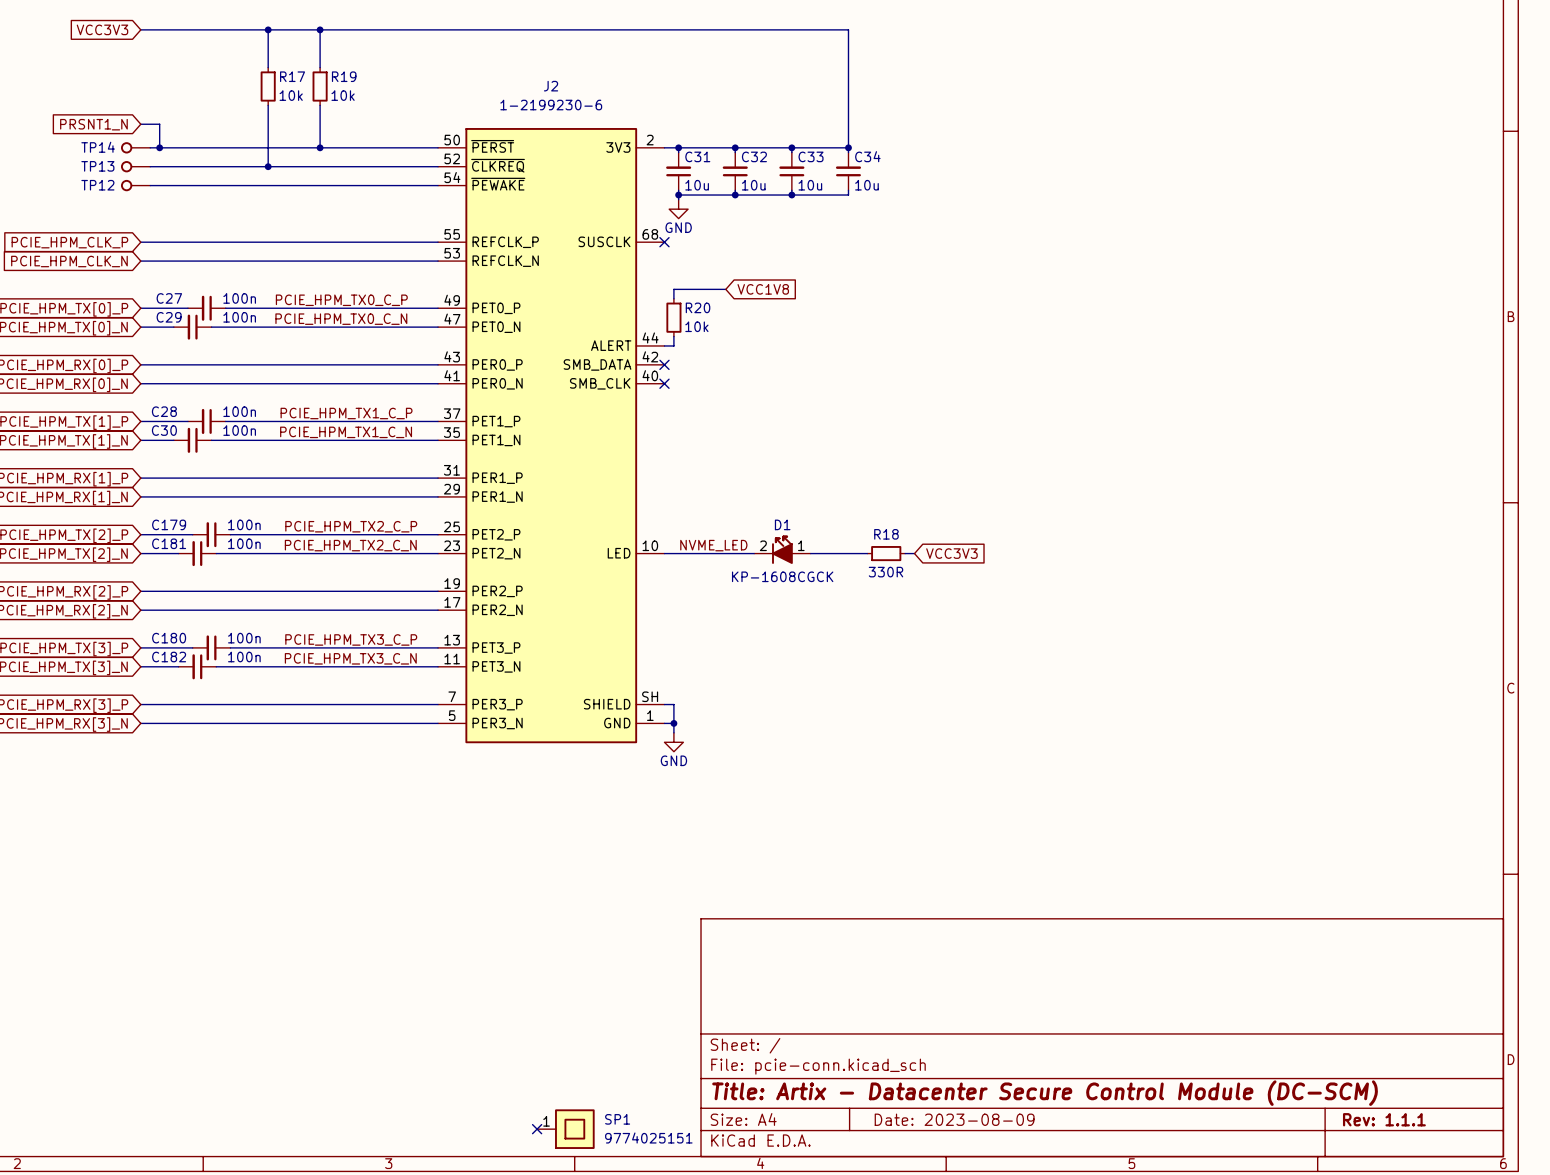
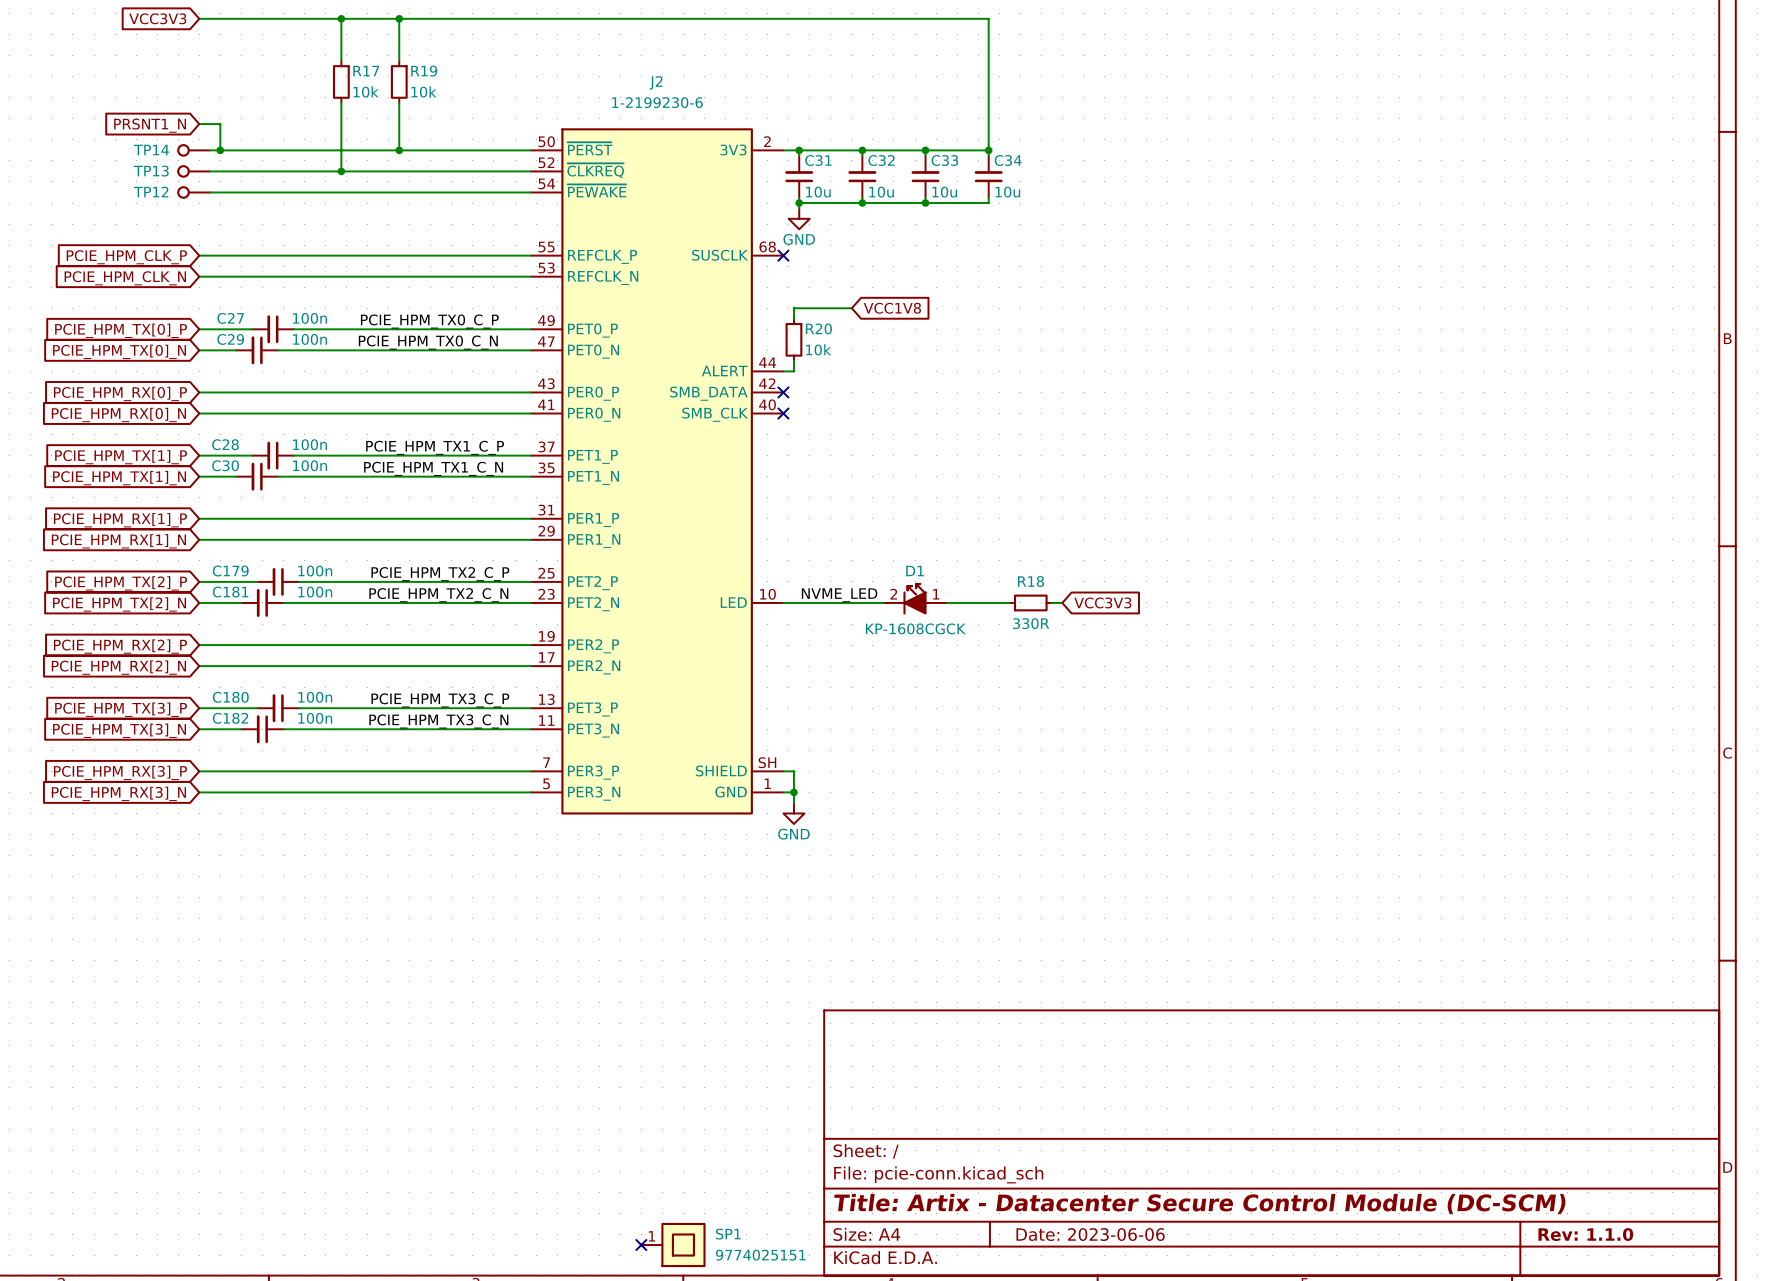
title block: Date: 2023-08-09 (954, 1119) -> Date: 2023-06-06 (1090, 1234)
title block: Rev: 1.1.1 (1384, 1119) -> Rev: 1.1.0 (1585, 1234)

